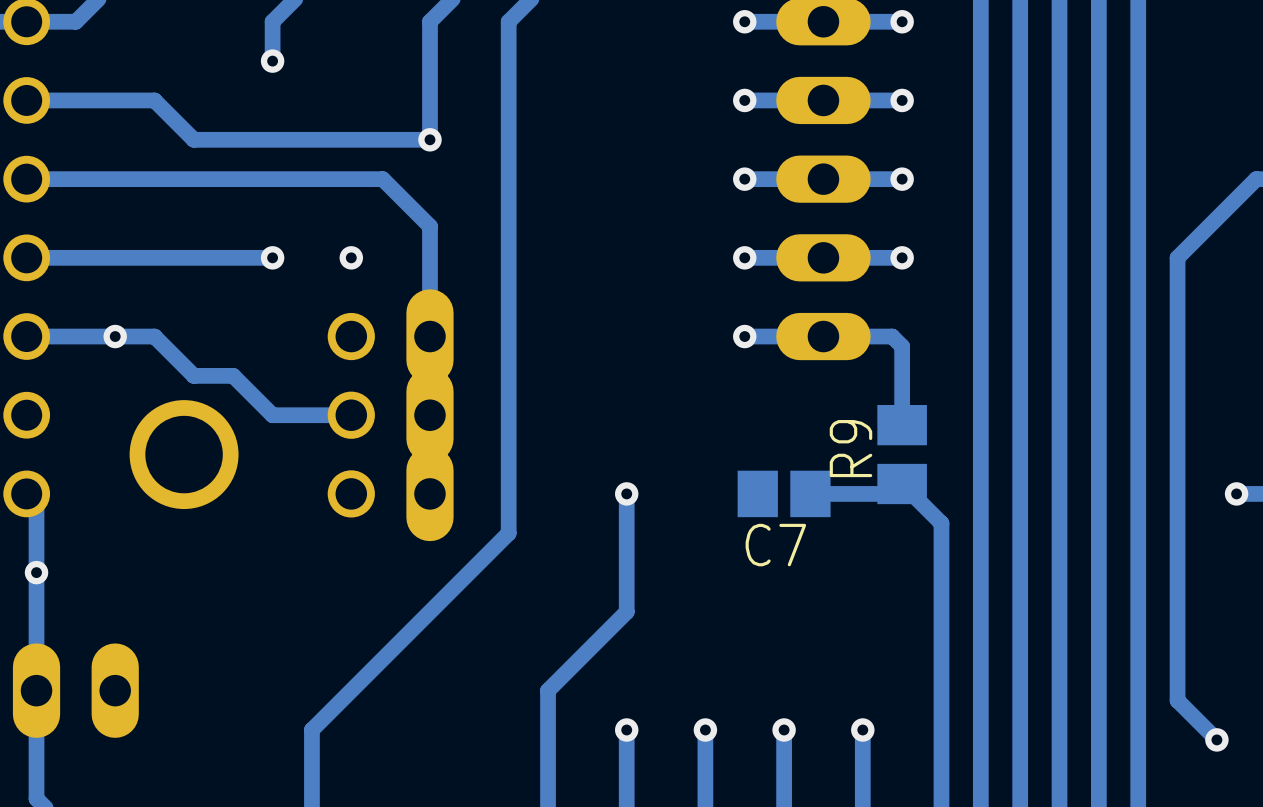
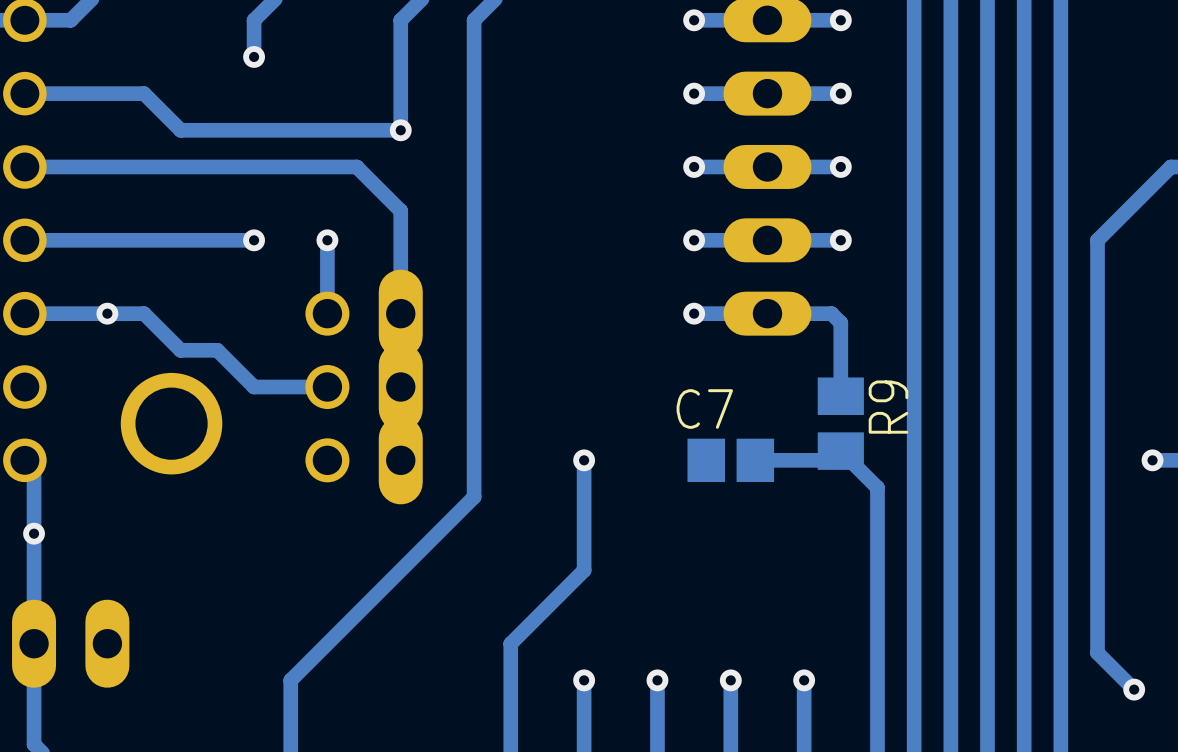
track: none -> (327, 240) (327, 313)
R9 name position: R9 (850, 448) -> R9 (888, 407)
C7 name position: C7 (775, 545) -> C7 (704, 409)

